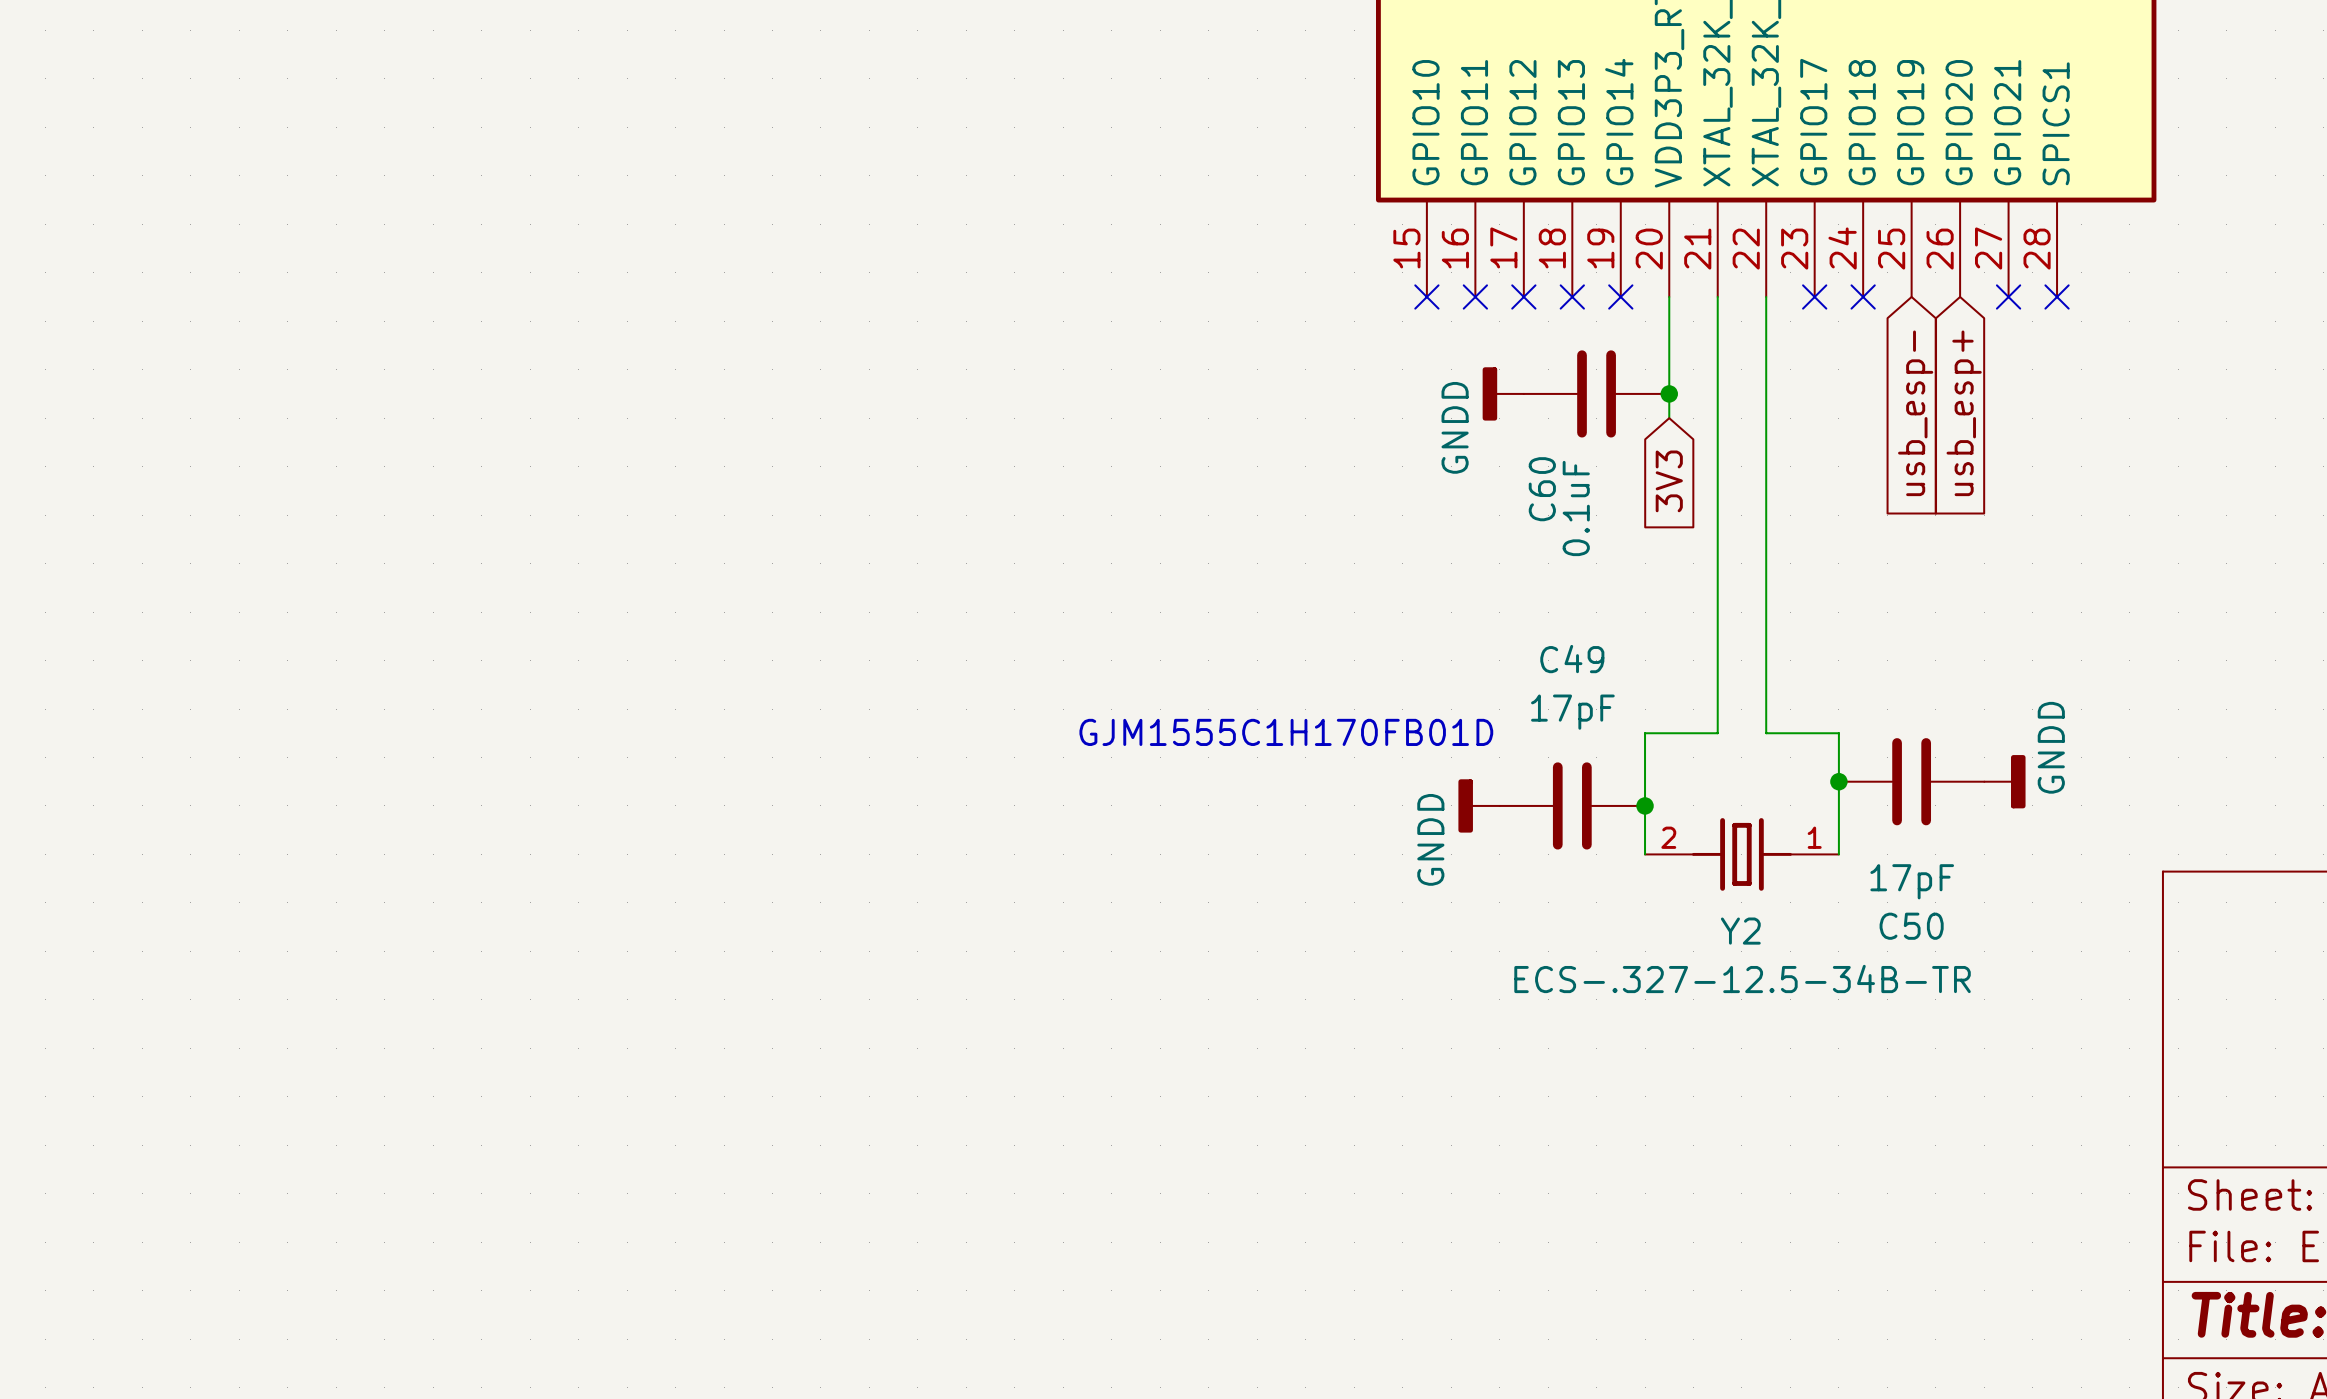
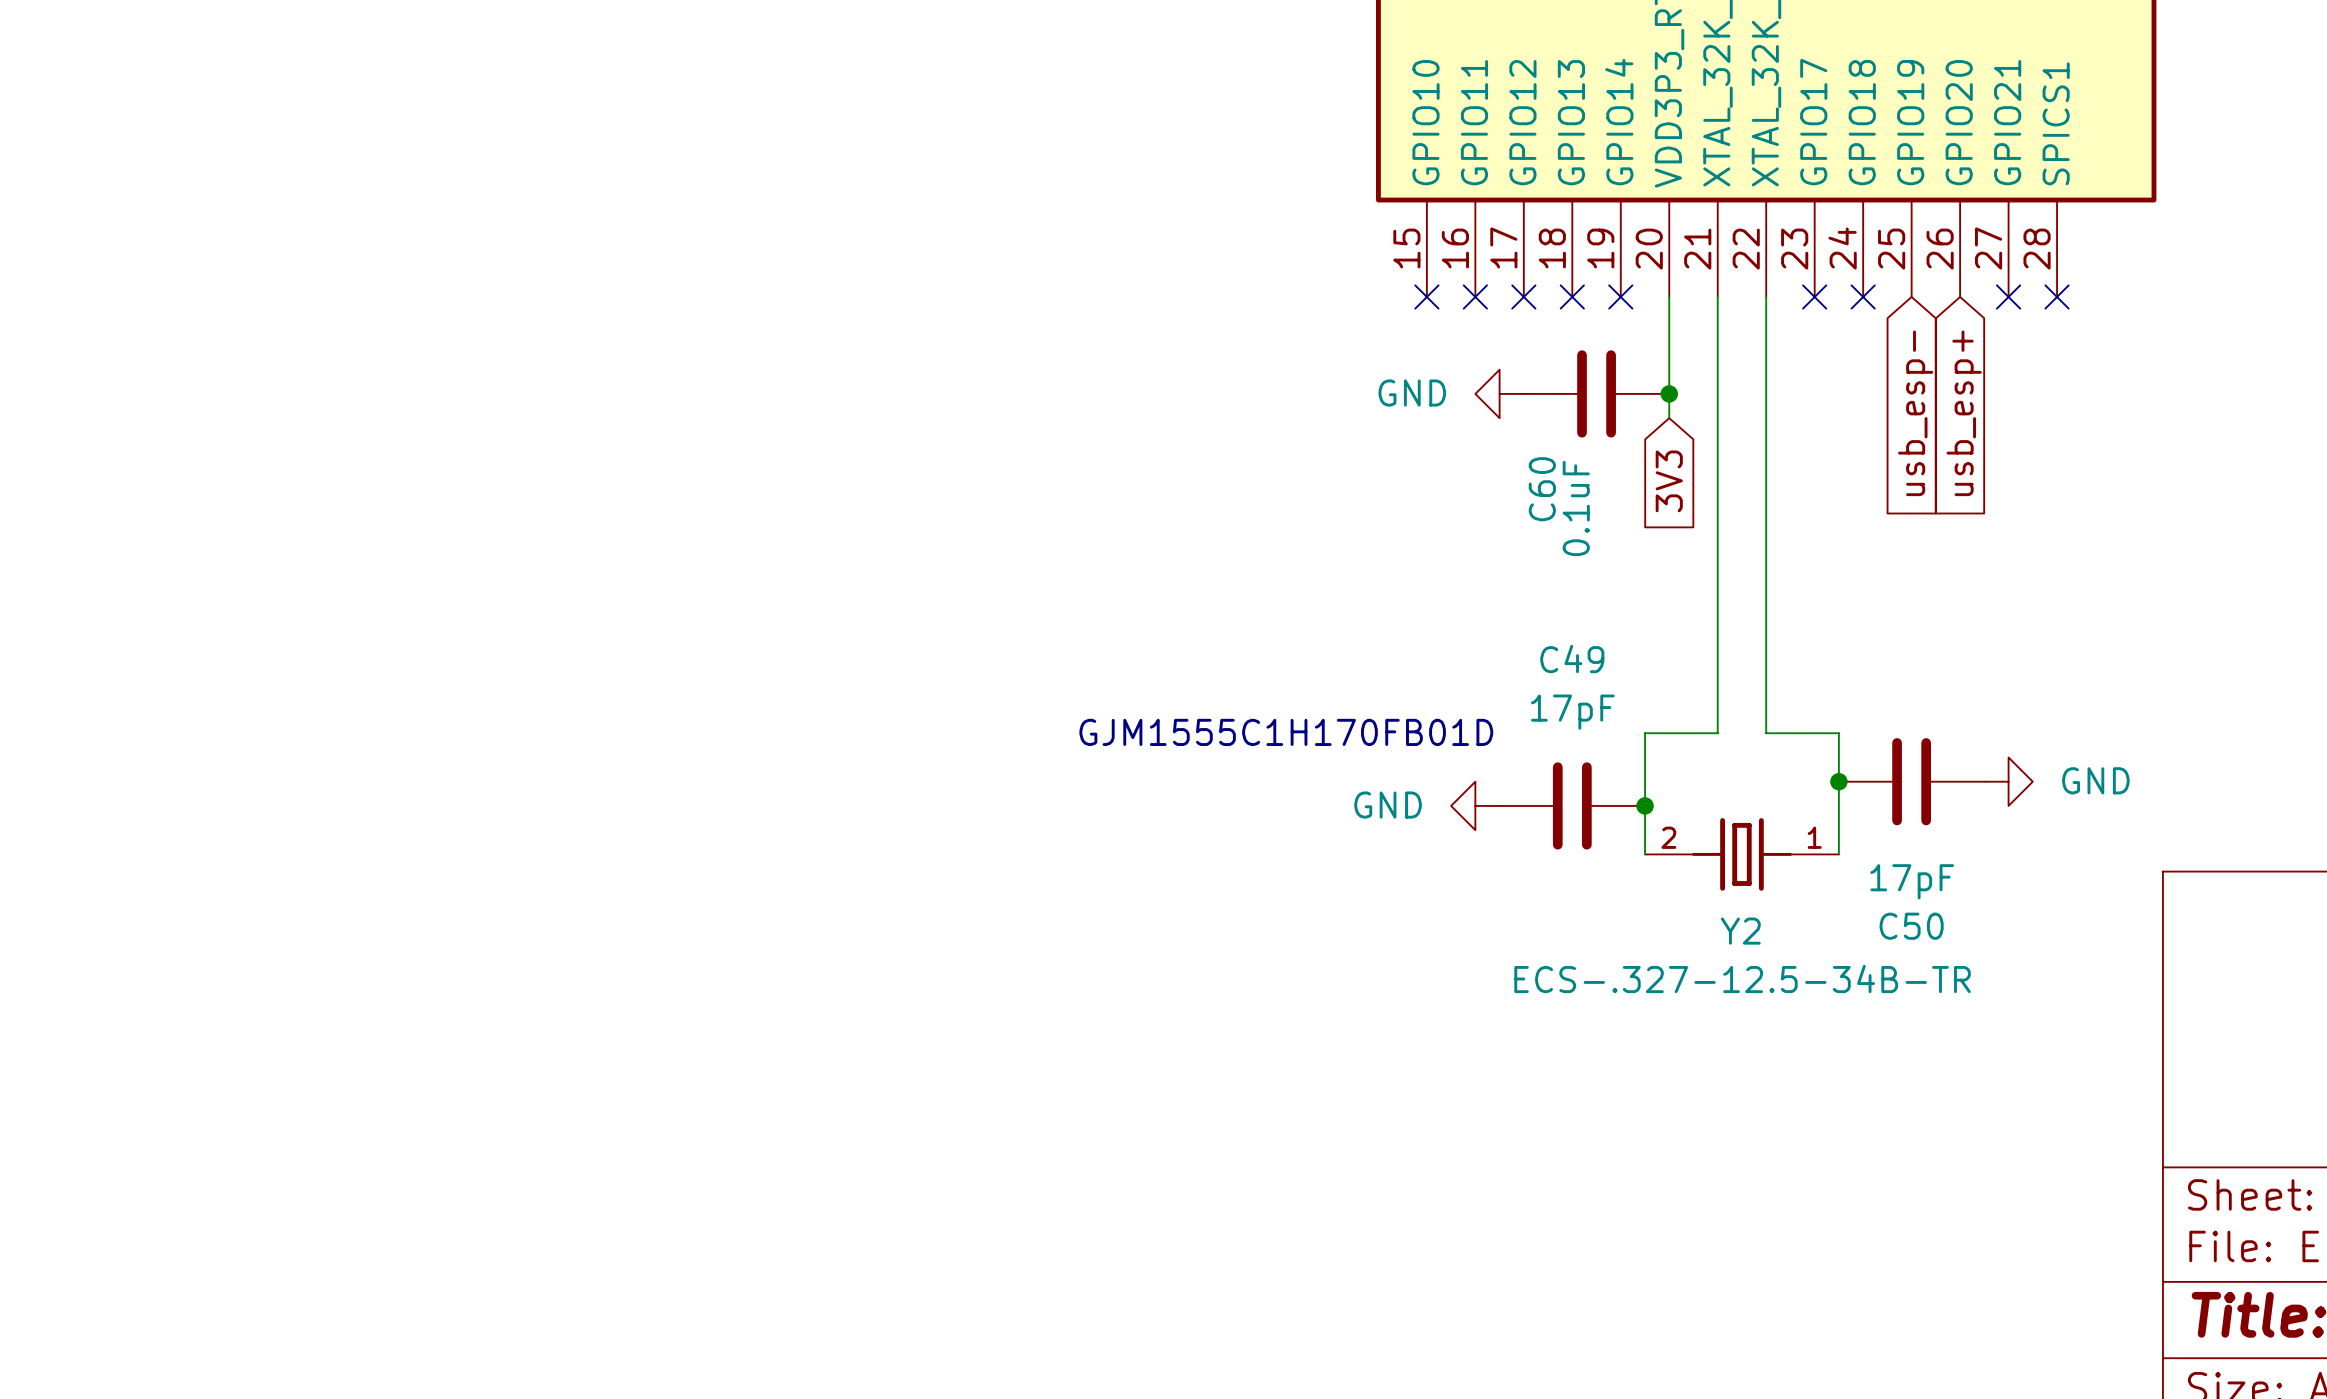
power symbol: GNDD (1503, 393) -> GND (1499, 393)
power symbol: GNDD (2004, 781) -> GND (2008, 781)
power symbol: GNDD (1479, 805) -> GND (1475, 805)

